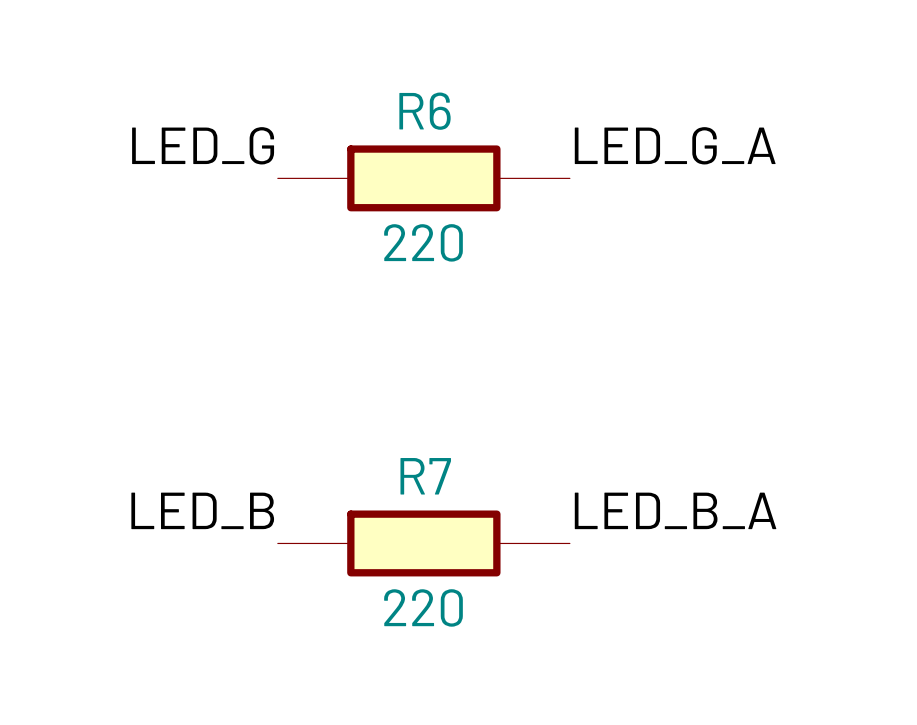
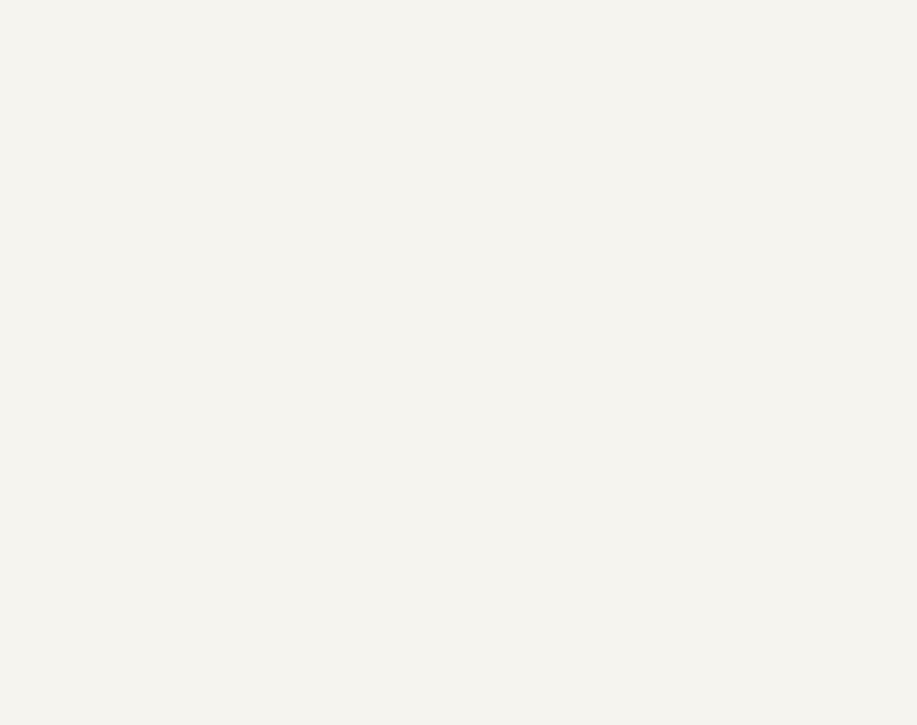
label: LED_G (203, 145) -> none
label: LED_G_A (675, 145) -> none
R6: 220 (423, 178) -> none
label: LED_B (202, 510) -> none
label: LED_B_A (675, 510) -> none
R7: 220 (423, 543) -> none

